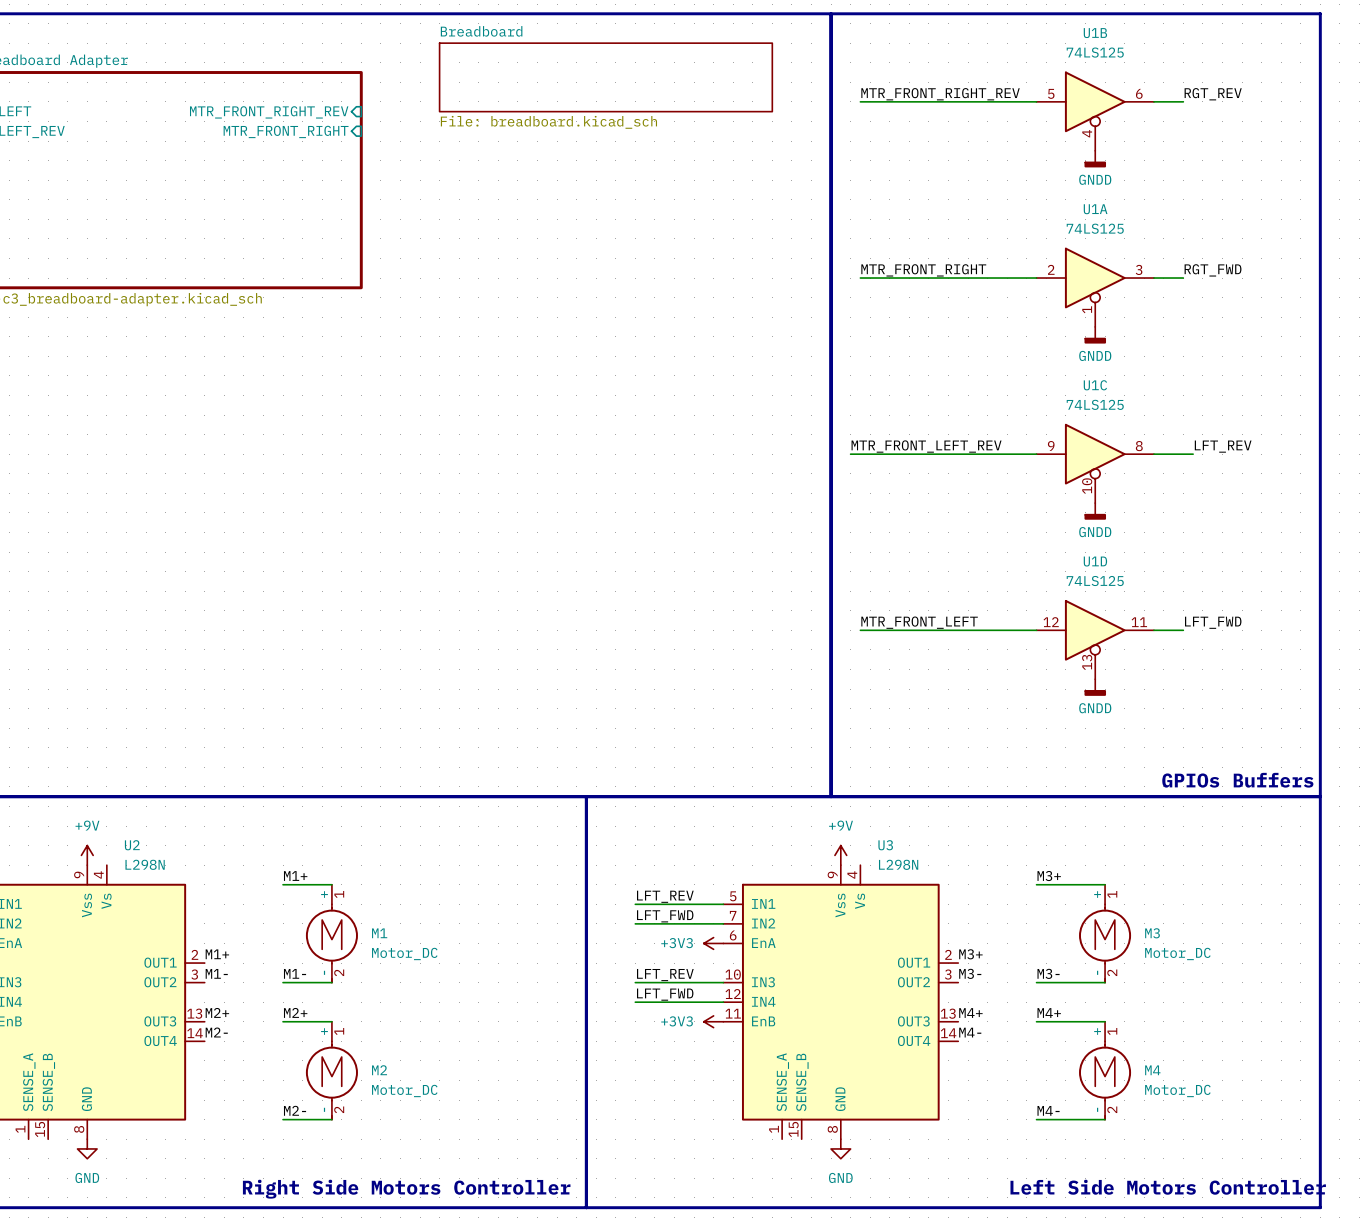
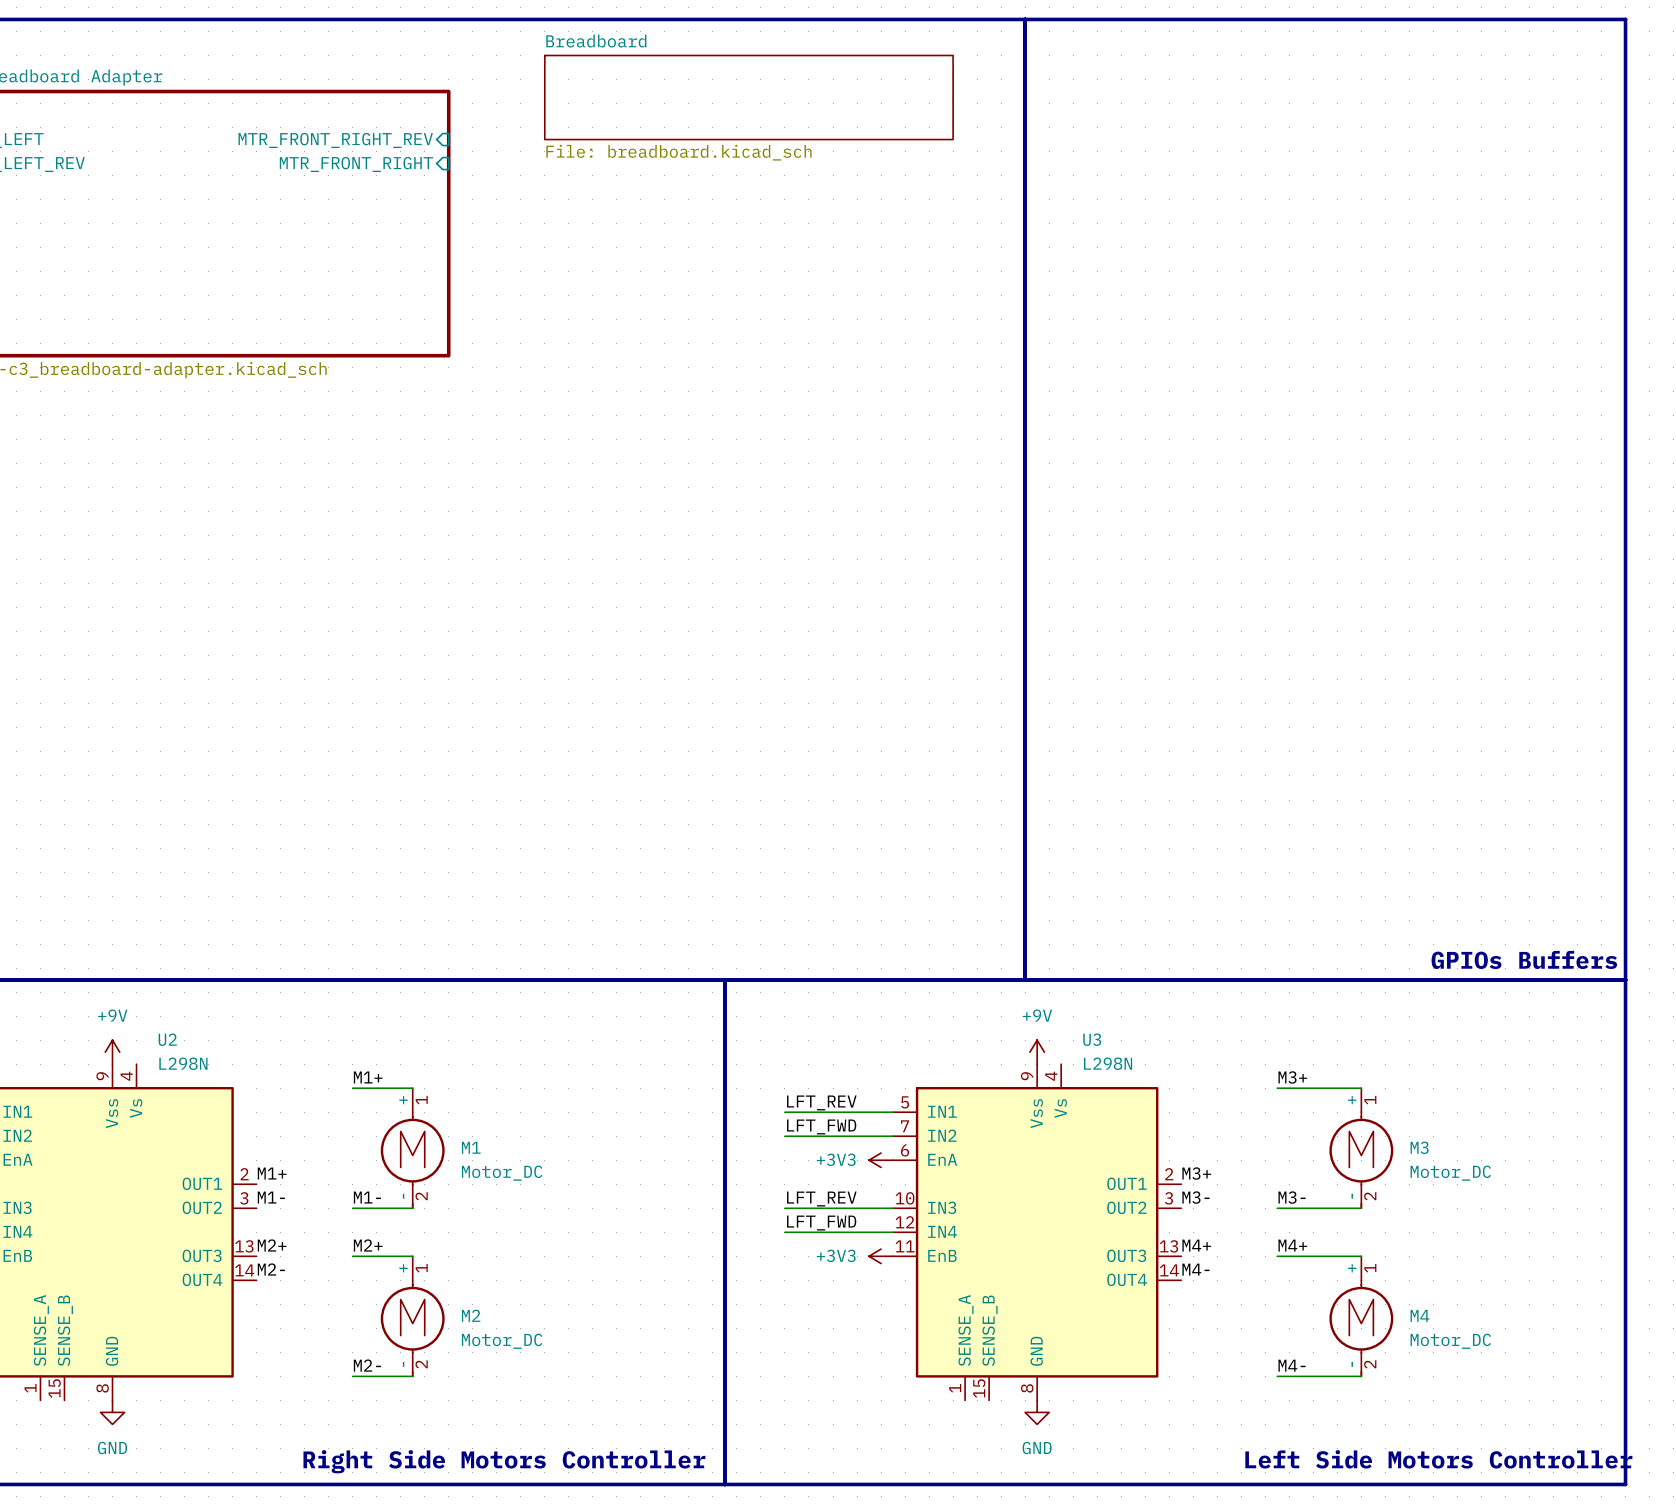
label: MTR_FRONT_RIGHT_REV (940, 94) -> none
label: RGT_REV (1213, 94) -> none
wire: (860, 101) (1036, 101) -> none
wire: (1153, 101) (1183, 101) -> none
U1B: 74LS125 (1095, 111) -> none
power symbol: GNDD (1095, 159) -> none
label: MTR_FRONT_RIGHT (923, 270) -> none
label: RGT_FWD (1213, 270) -> none
wire: (860, 278) (1036, 278) -> none
wire: (1153, 278) (1183, 278) -> none
U1A: 74LS125 (1095, 287) -> none
power symbol: GNDD (1095, 335) -> none
label: MTR_FRONT_LEFT_REV (926, 446) -> none
label: LFT_REV (1223, 446) -> none
wire: (850, 454) (1036, 454) -> none
wire: (1153, 454) (1193, 454) -> none
U1C: 74LS125 (1095, 463) -> none
power symbol: GNDD (1095, 511) -> none
label: MTR_FRONT_LEFT (919, 622) -> none
label: LFT_FWD (1213, 622) -> none
wire: (860, 630) (1036, 630) -> none
wire: (1153, 630) (1183, 630) -> none
U1D: 74LS125 (1095, 639) -> none
power symbol: GNDD (1095, 687) -> none

